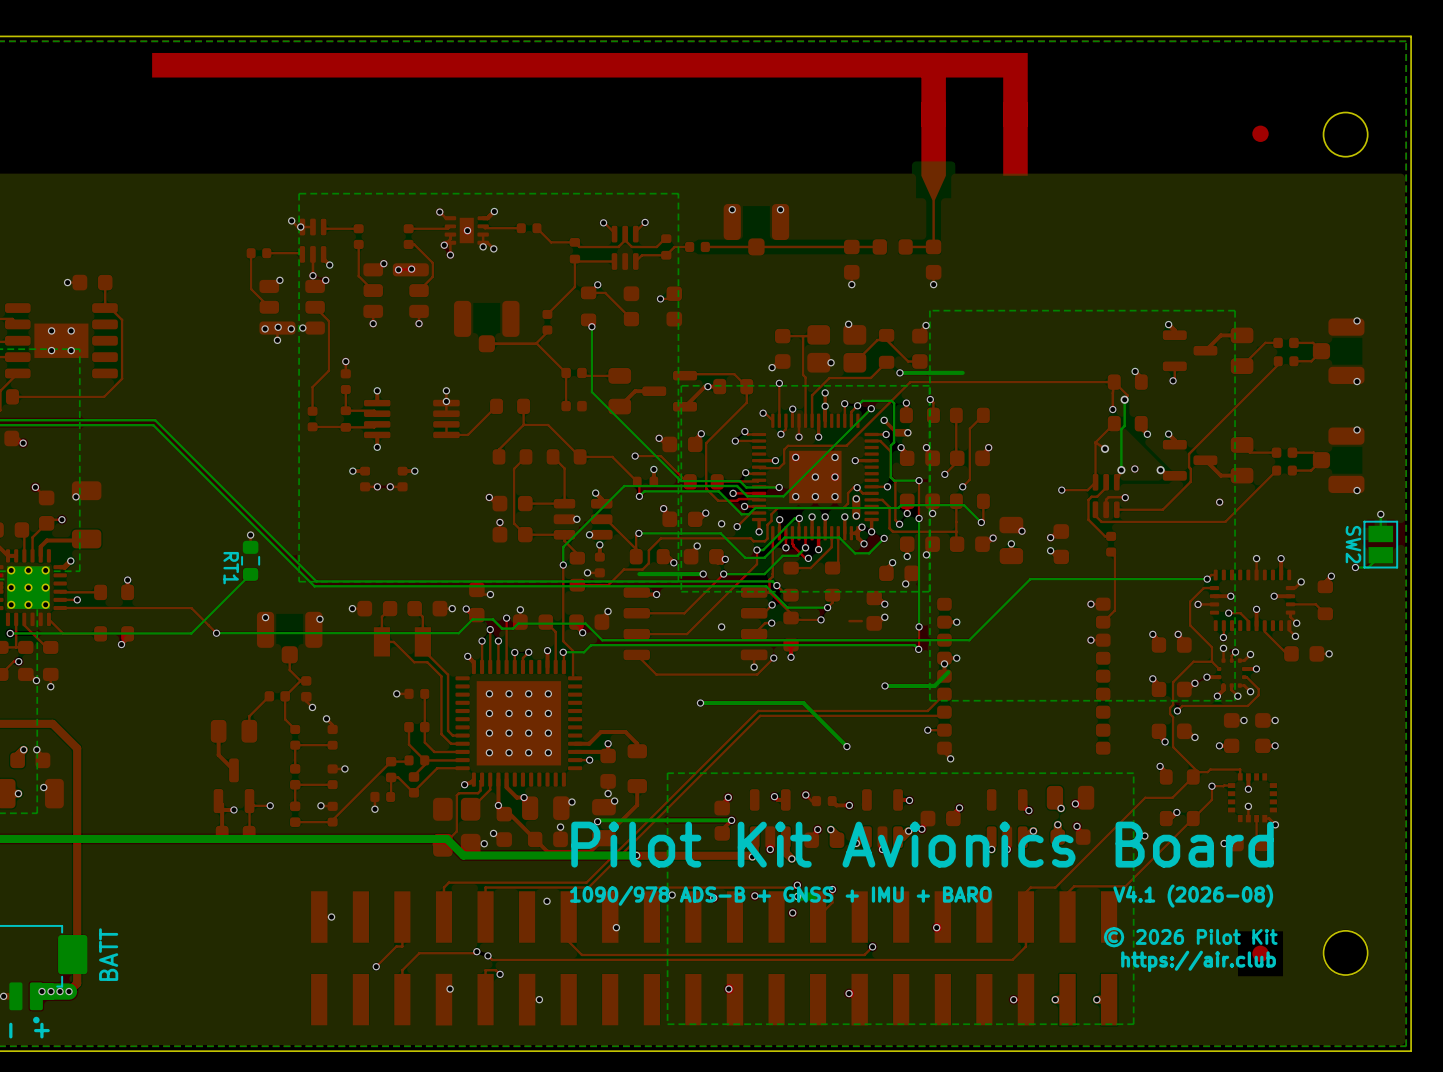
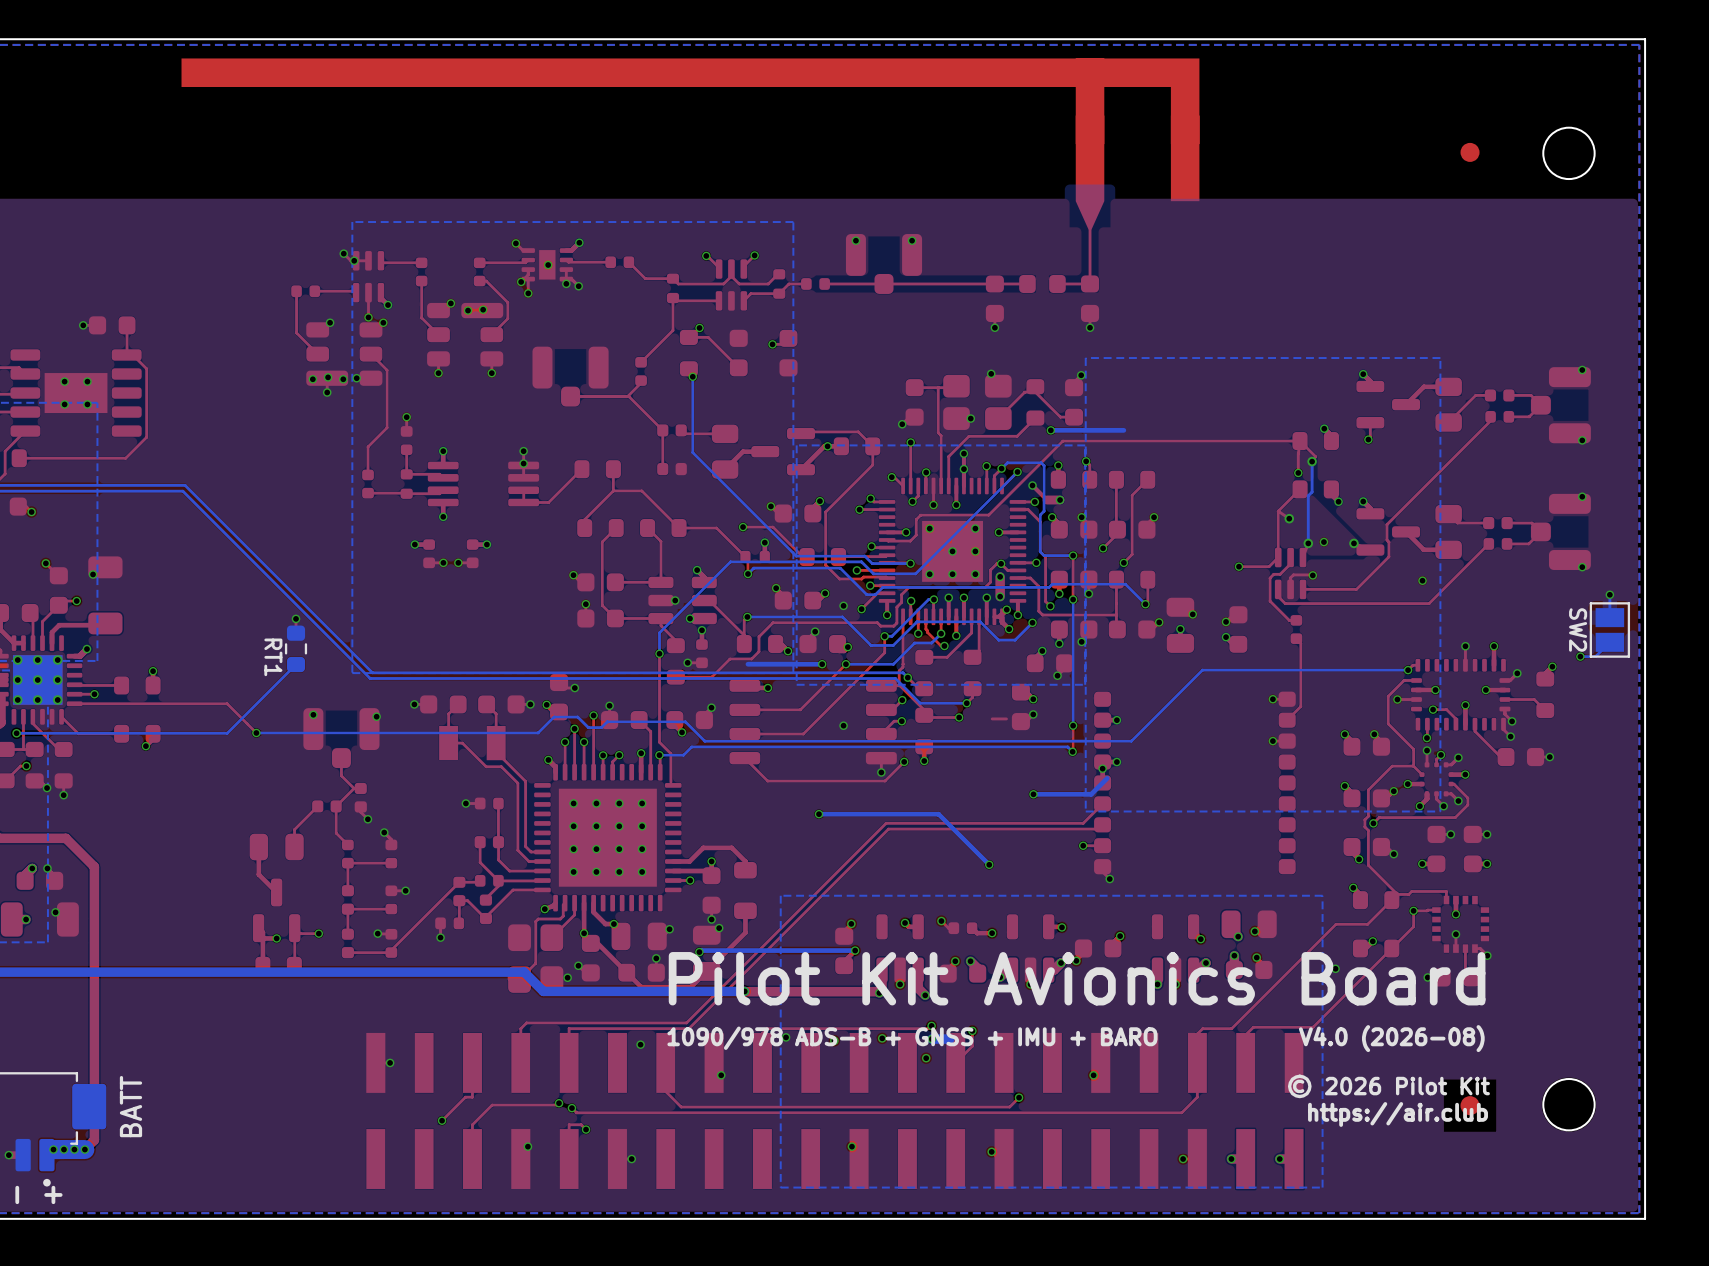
text: V4.1 (2026-08) (1193, 896) -> V4.0 (2026-08) (1391, 1038)

